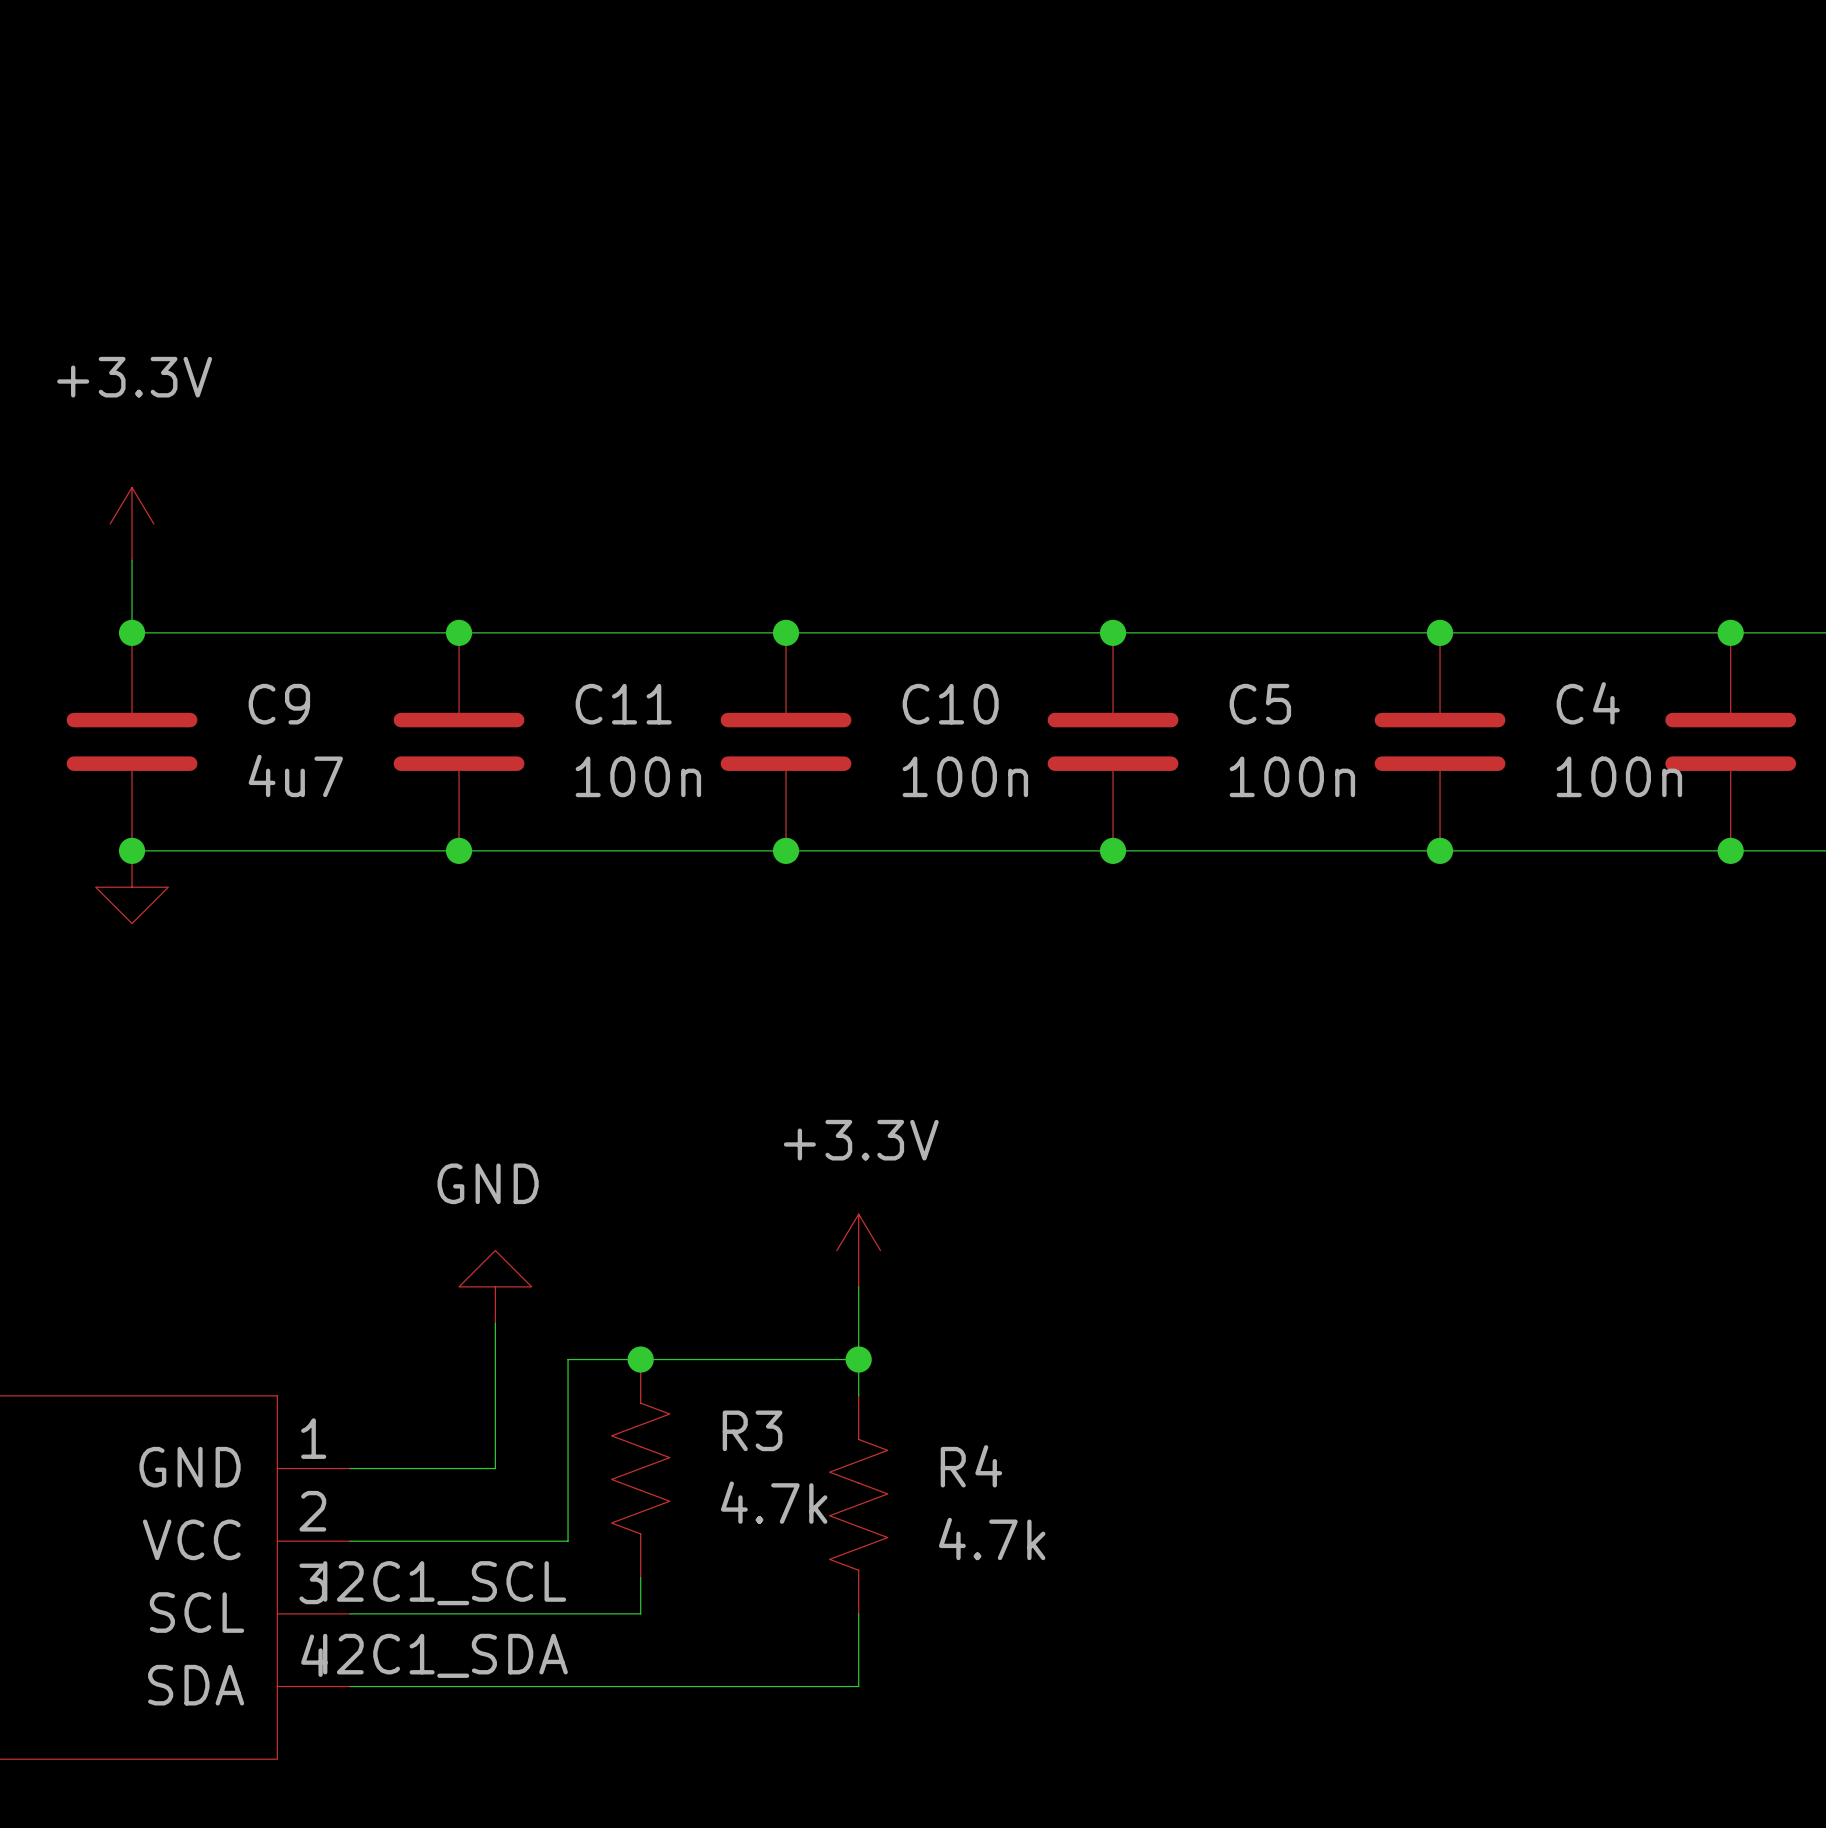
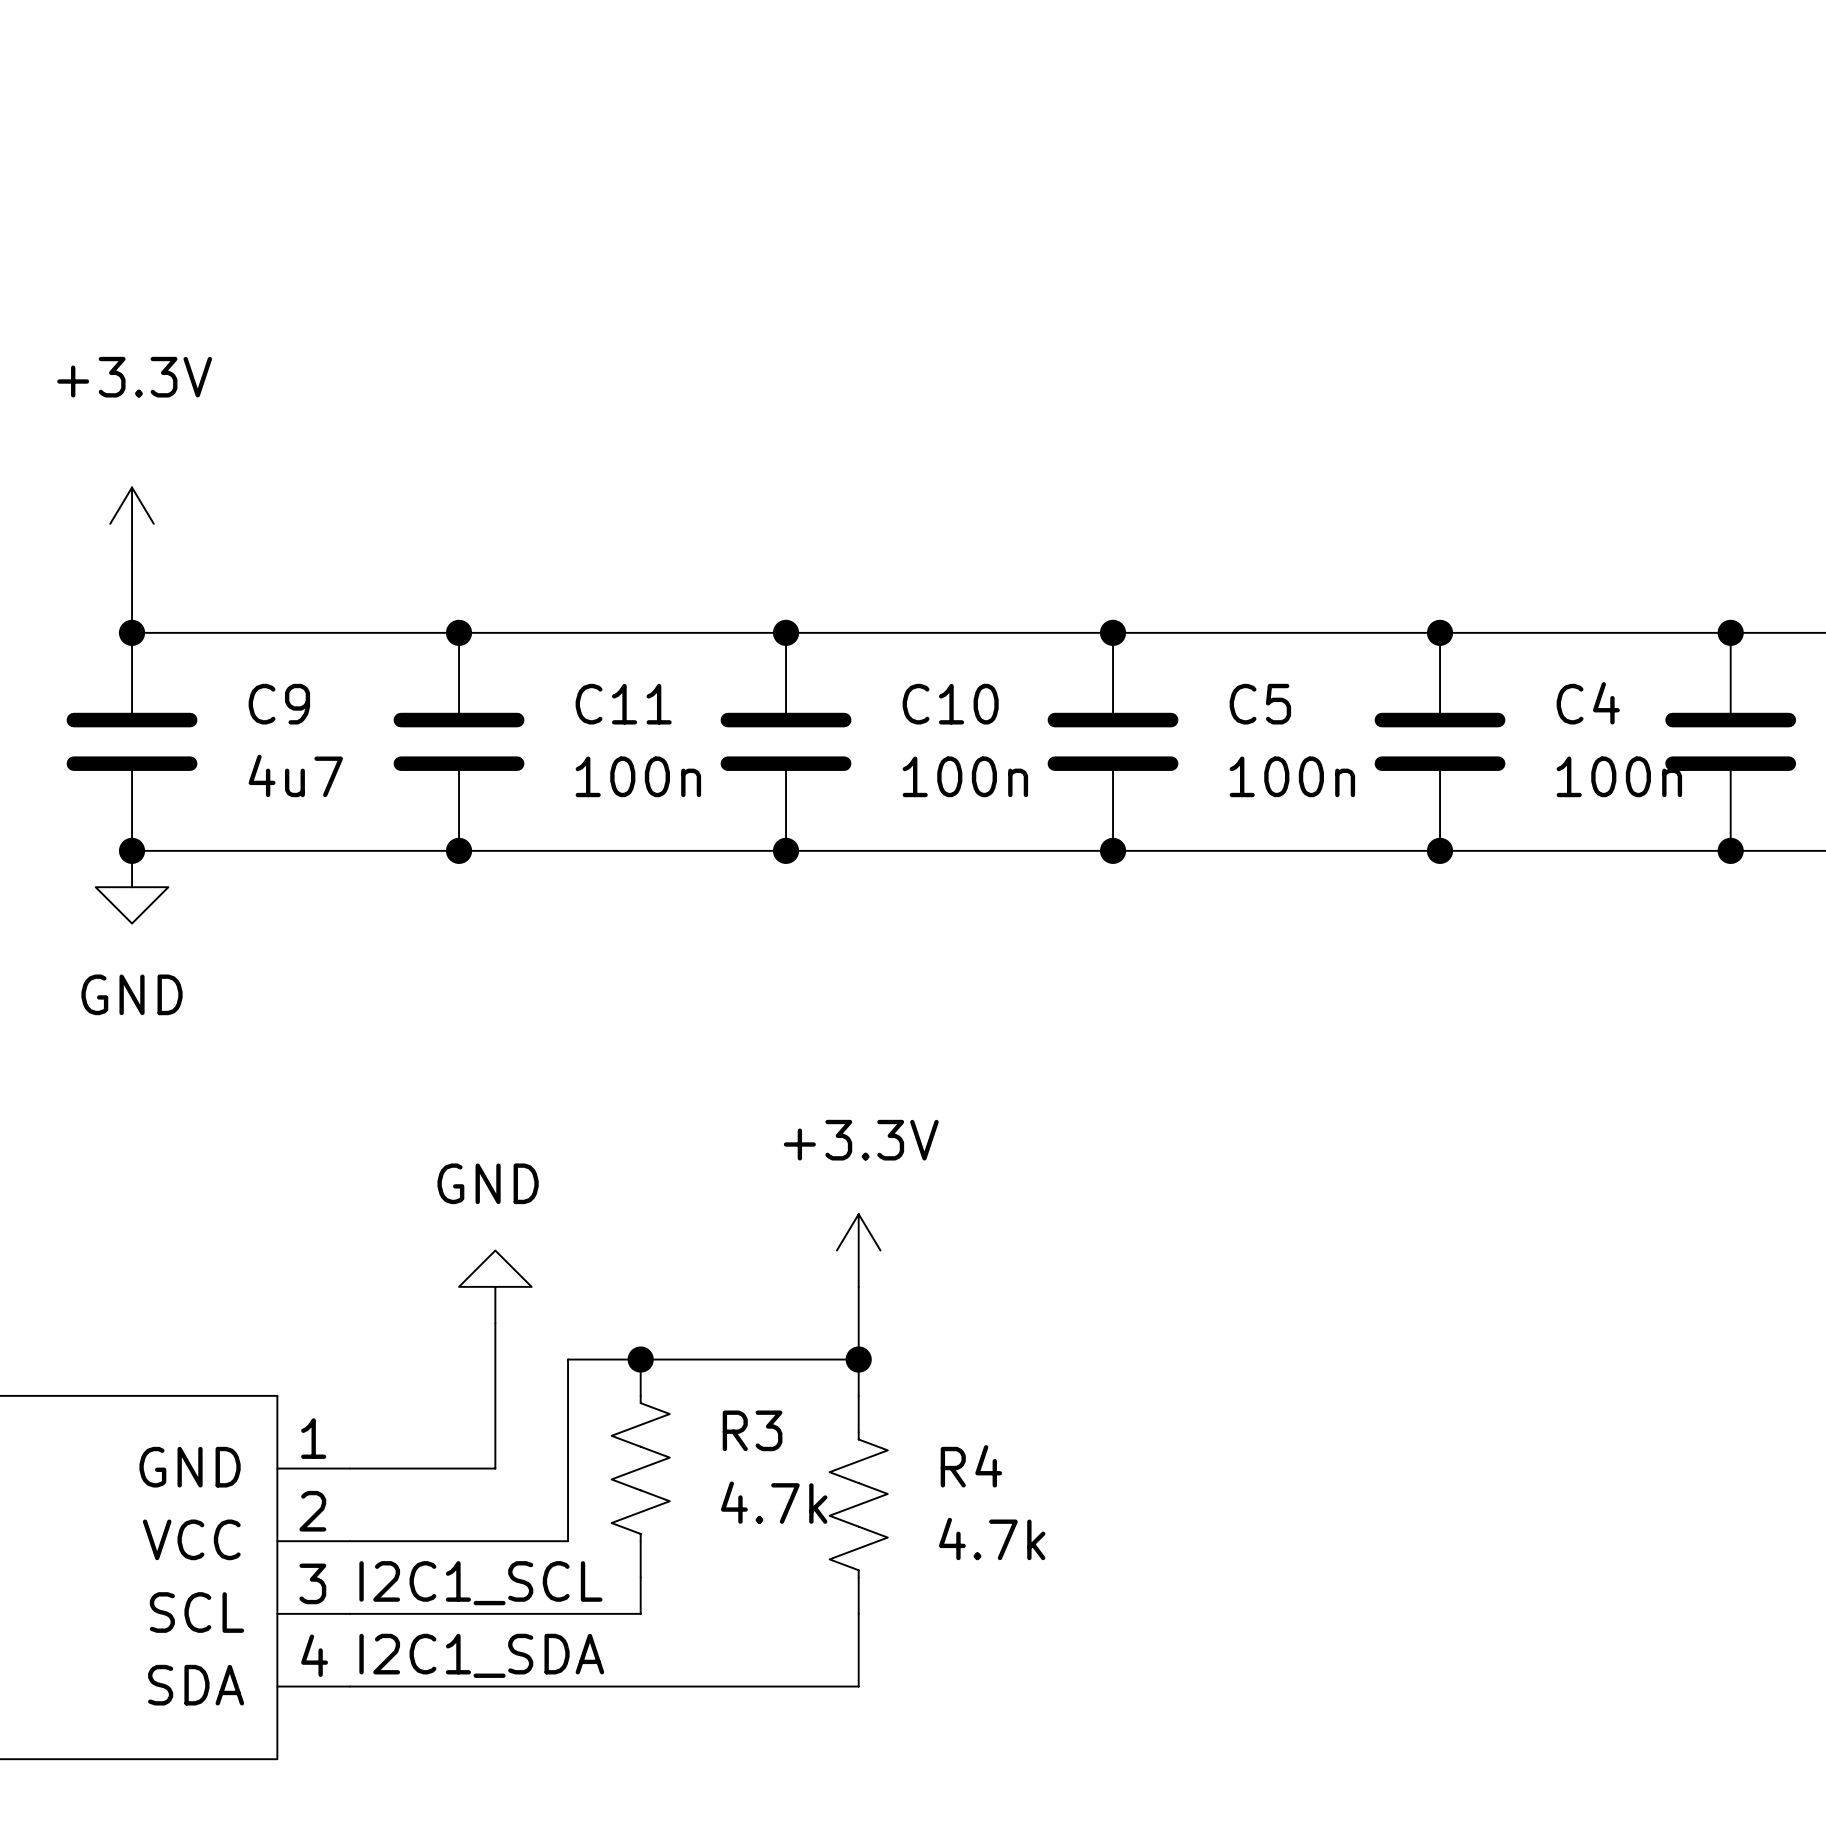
power symbol text: none -> GND (132, 994)
label position: I2C1_SCL (444, 1583) -> I2C1_SCL (480, 1583)
label position: I2C1_SDA (445, 1655) -> I2C1_SDA (481, 1655)

